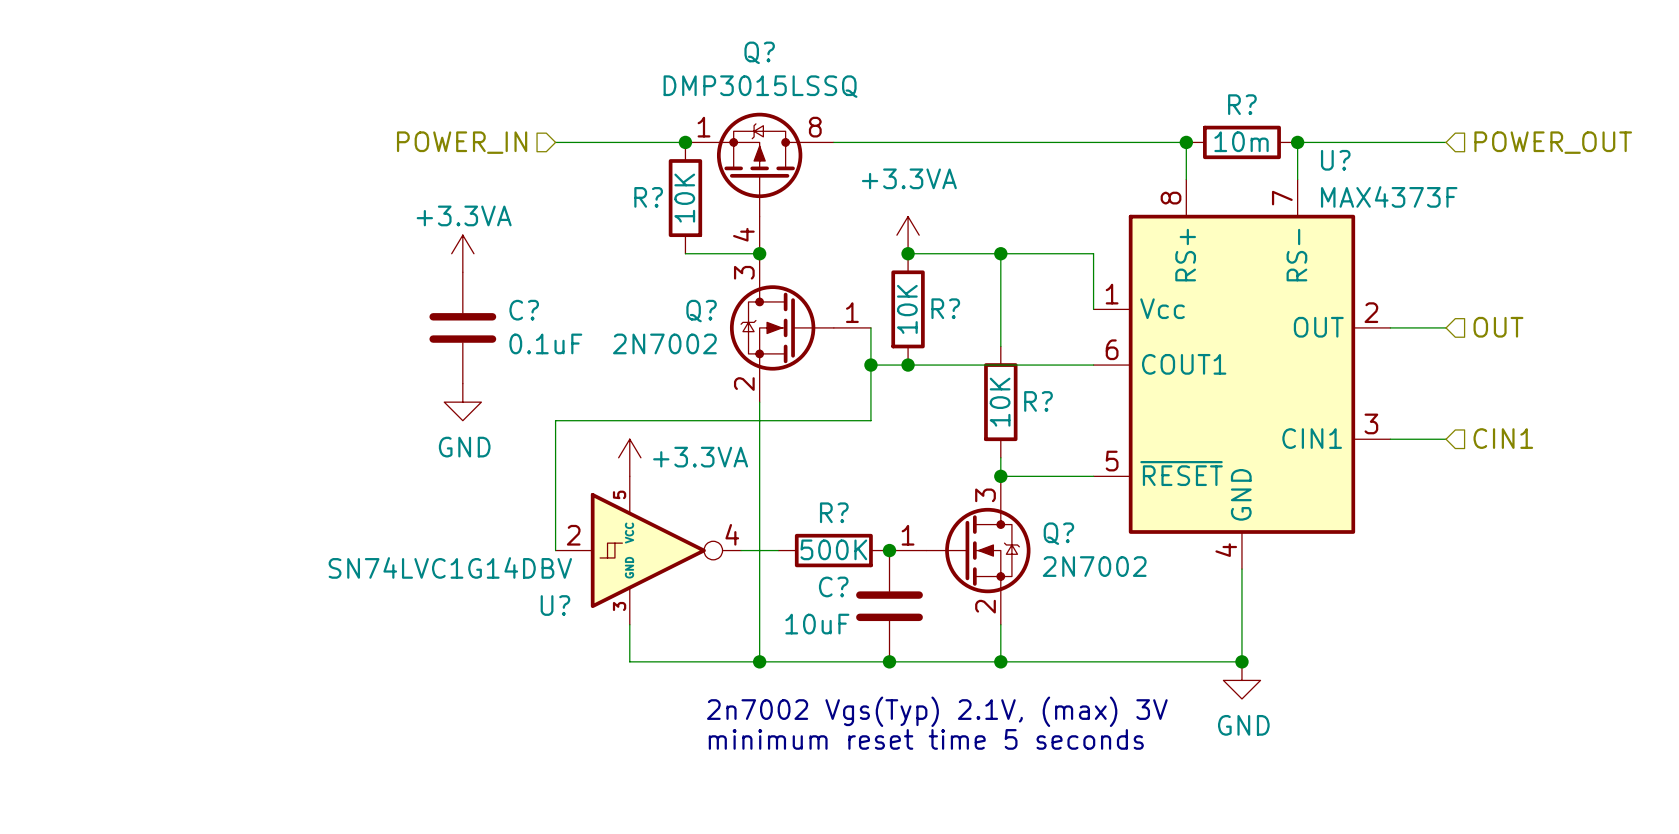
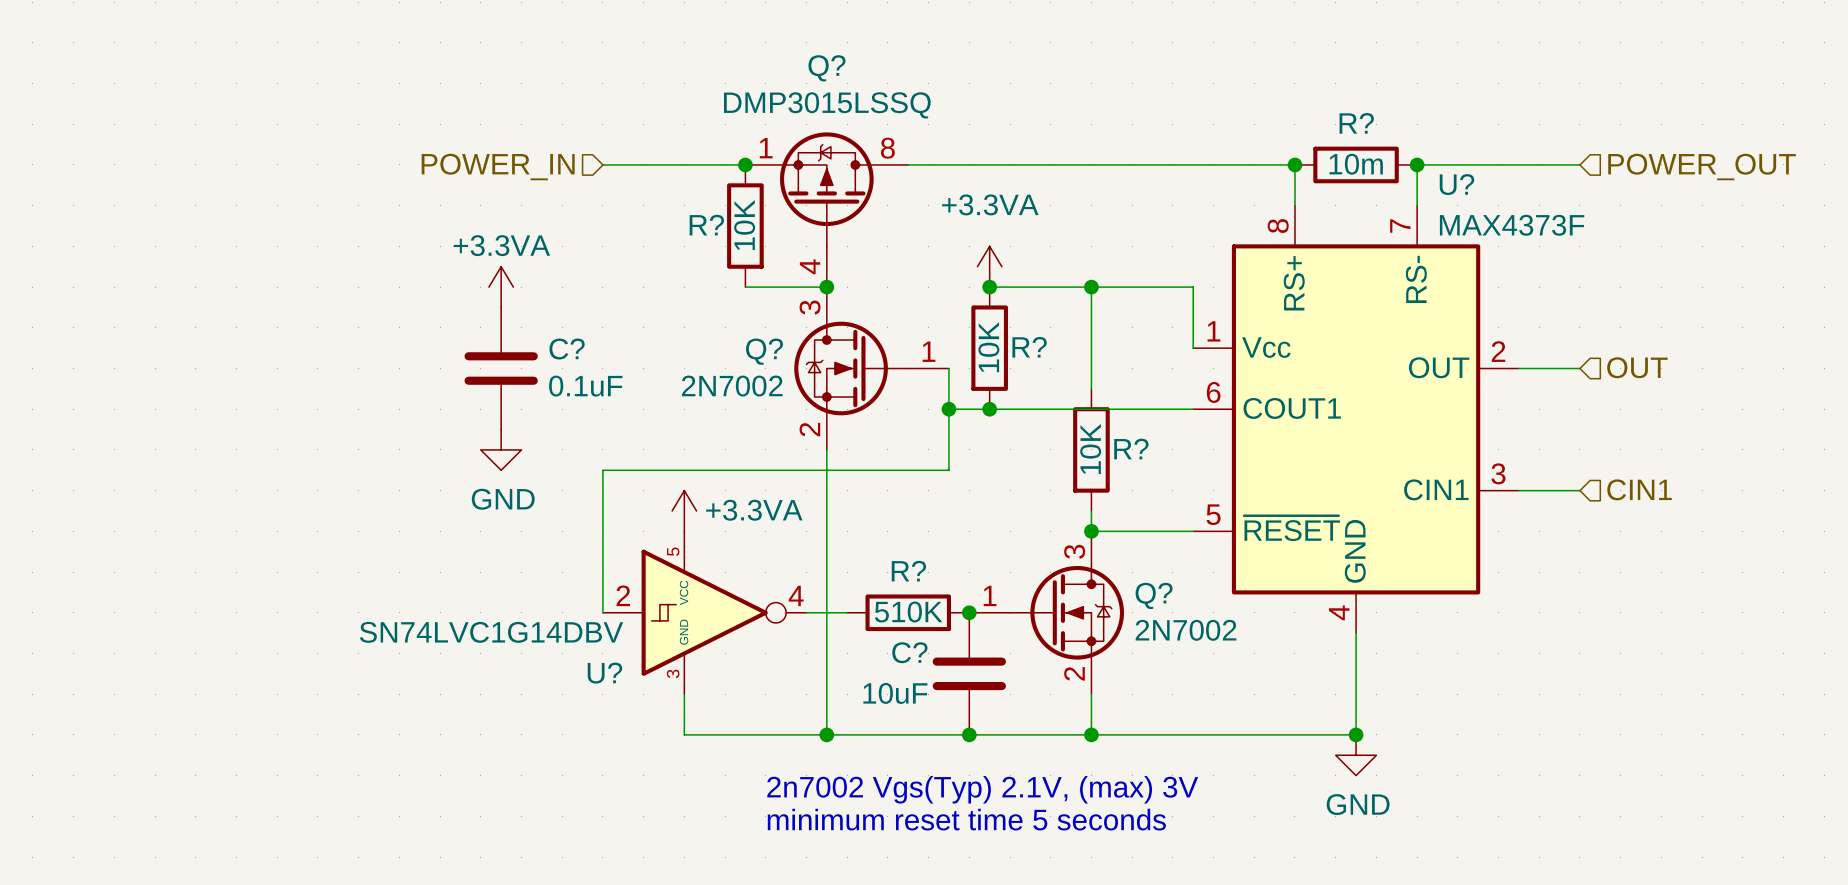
R? value: 500K (833, 549) -> 510K (908, 612)

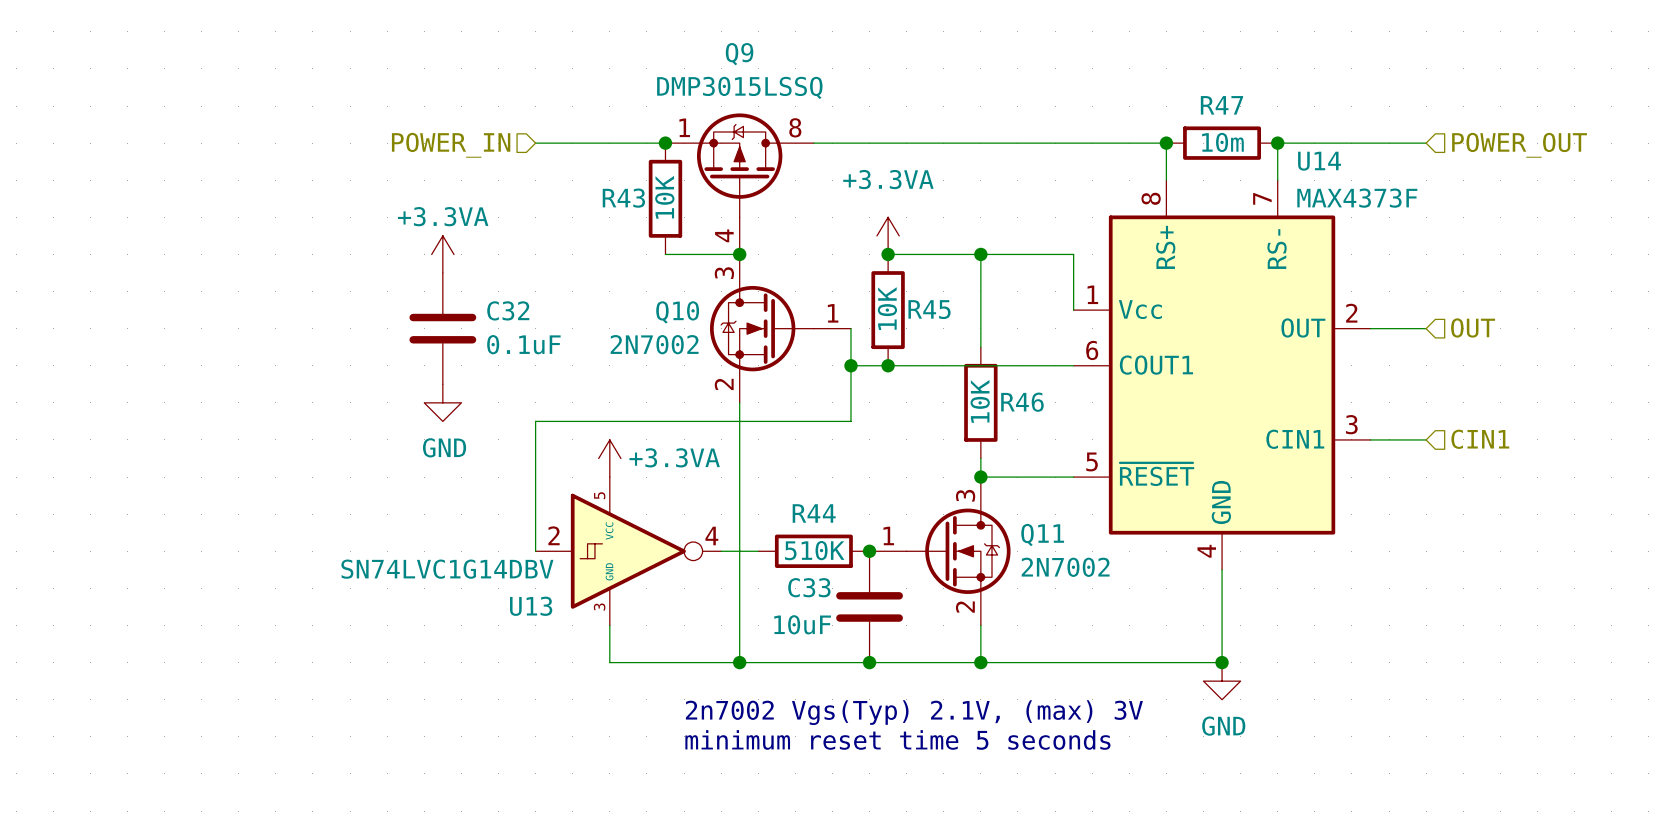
Q? name: Q? (826, 68) -> Q9 (739, 54)
R? name: R? (1356, 123) -> R47 (1221, 105)
U? name: U? (1456, 184) -> U14 (1319, 161)
R? name: R? (706, 225) -> R43 (623, 198)
R? name: R? (1029, 347) -> R45 (929, 309)
C? name: C? (567, 349) -> C32 (508, 310)
Q? name: Q? (764, 351) -> Q10 (677, 312)
R? name: R? (1131, 449) -> R46 (1022, 402)
R? name: R? (908, 571) -> R44 (814, 513)
Q? name: Q? (1154, 595) -> Q11 (1042, 535)
C? name: C? (909, 652) -> C33 (809, 587)
U? name: U? (604, 673) -> U13 (531, 606)

